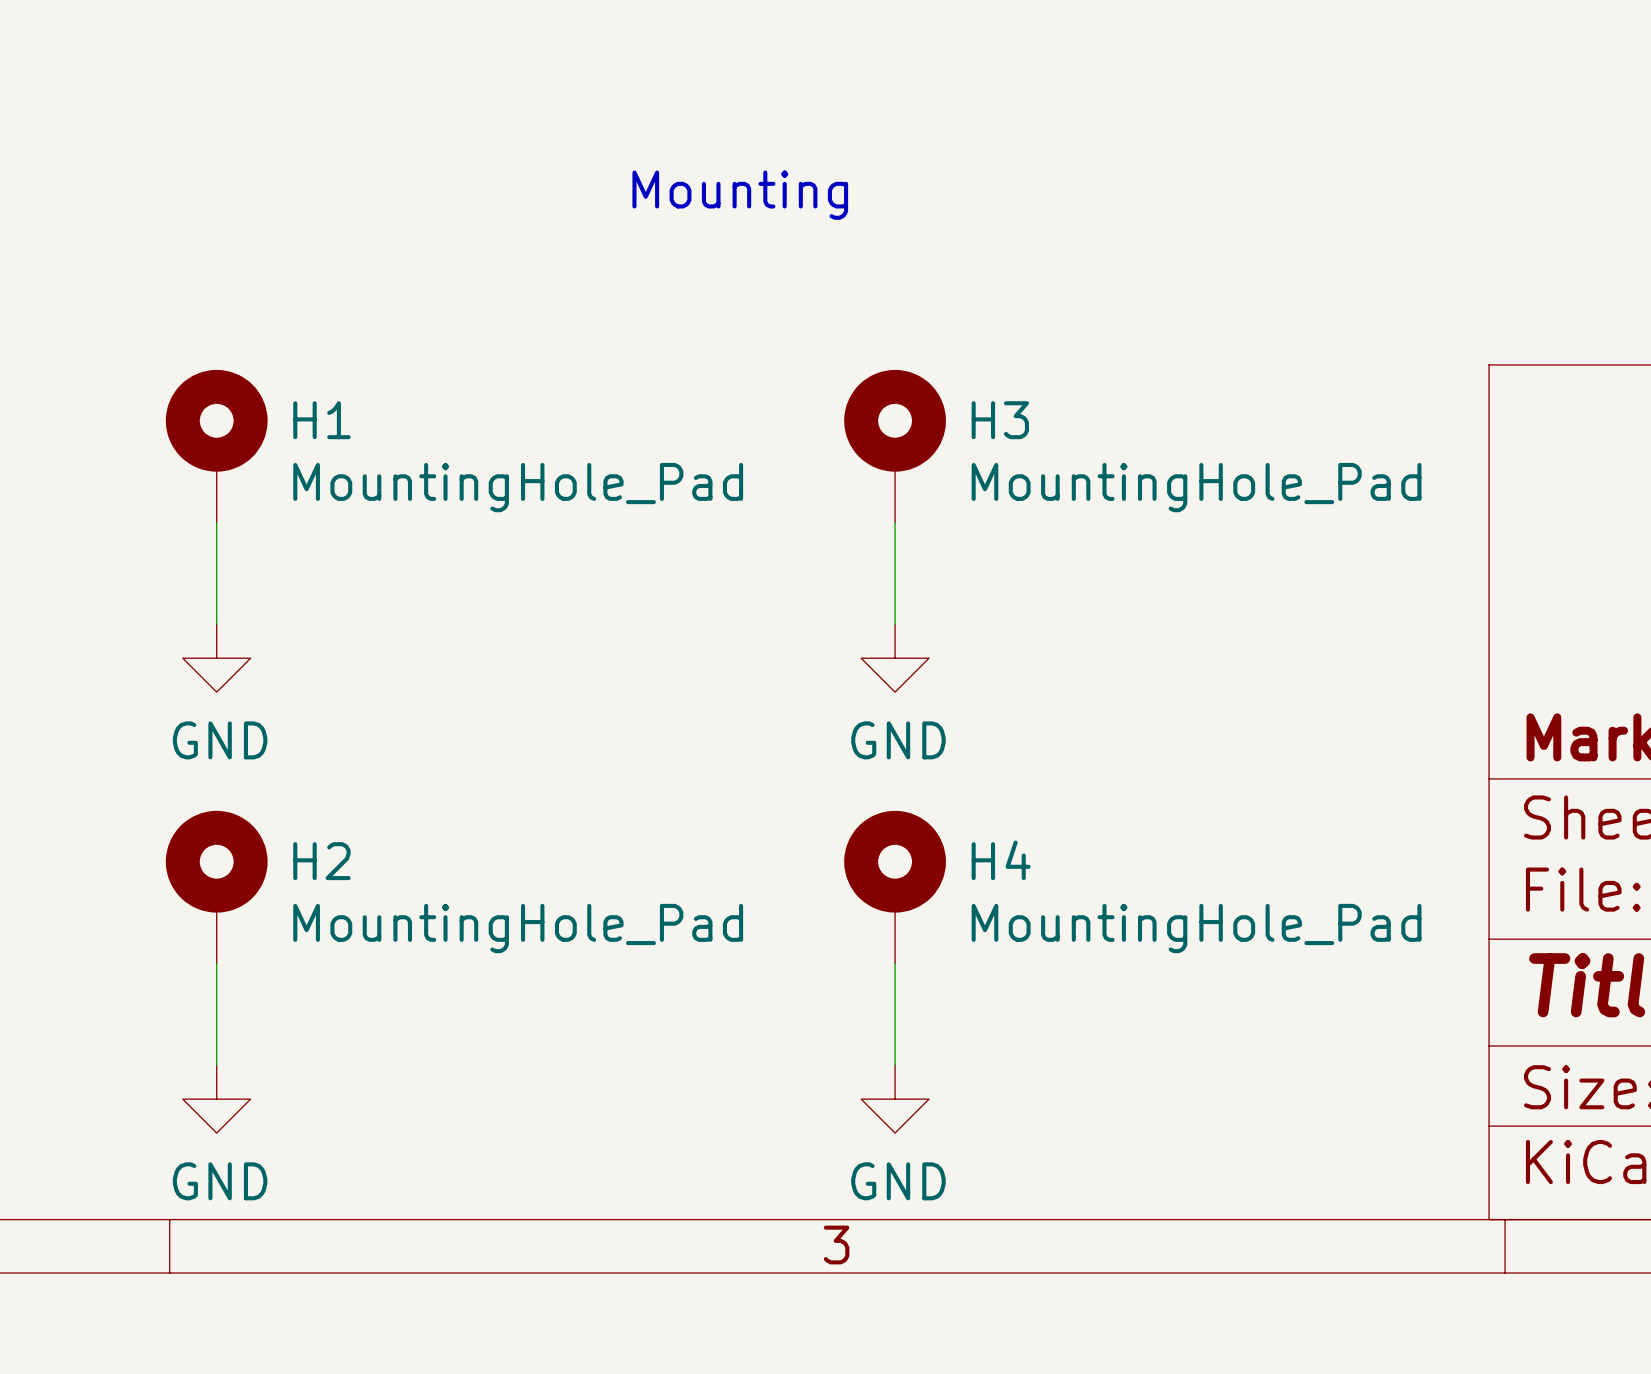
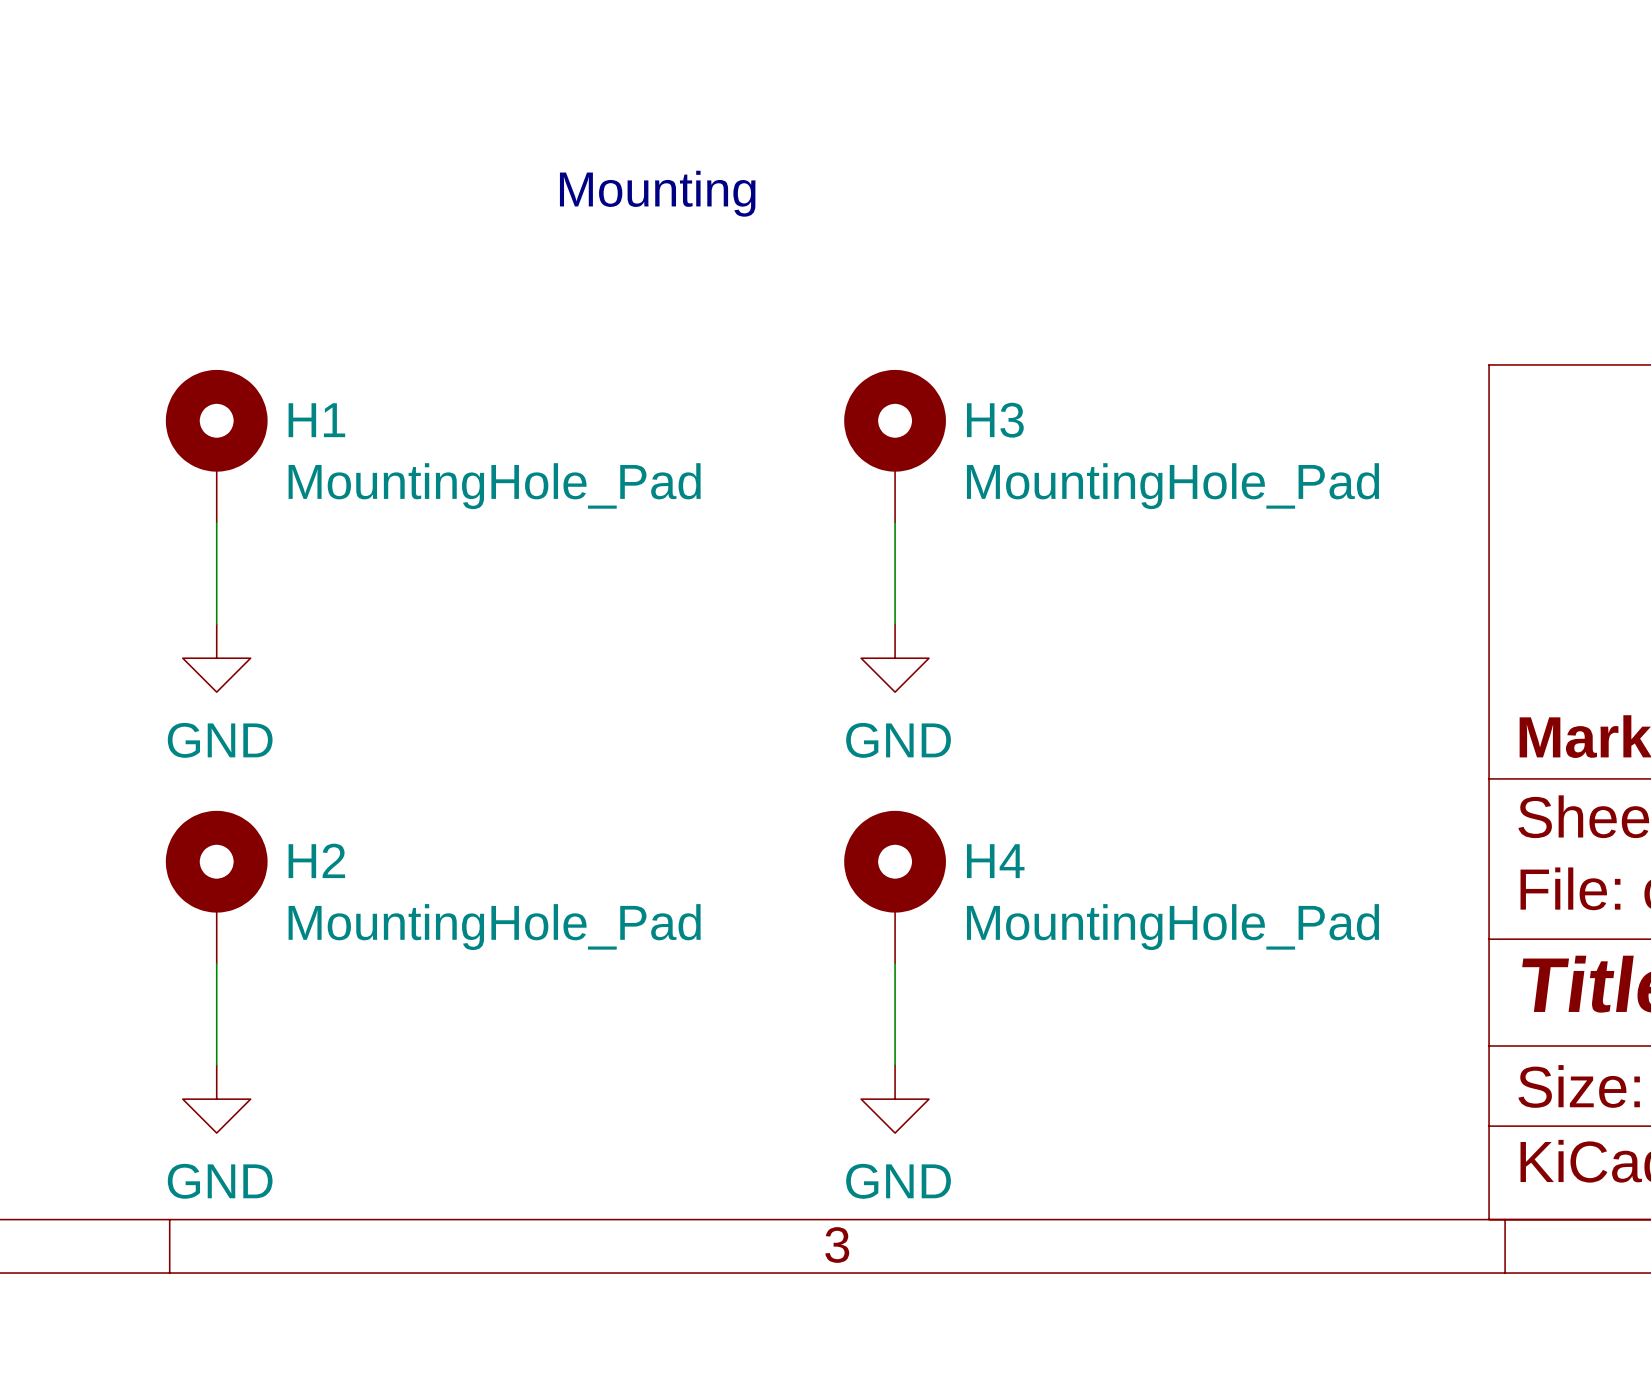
text position: Mounting (740, 195) -> Mounting (657, 193)

